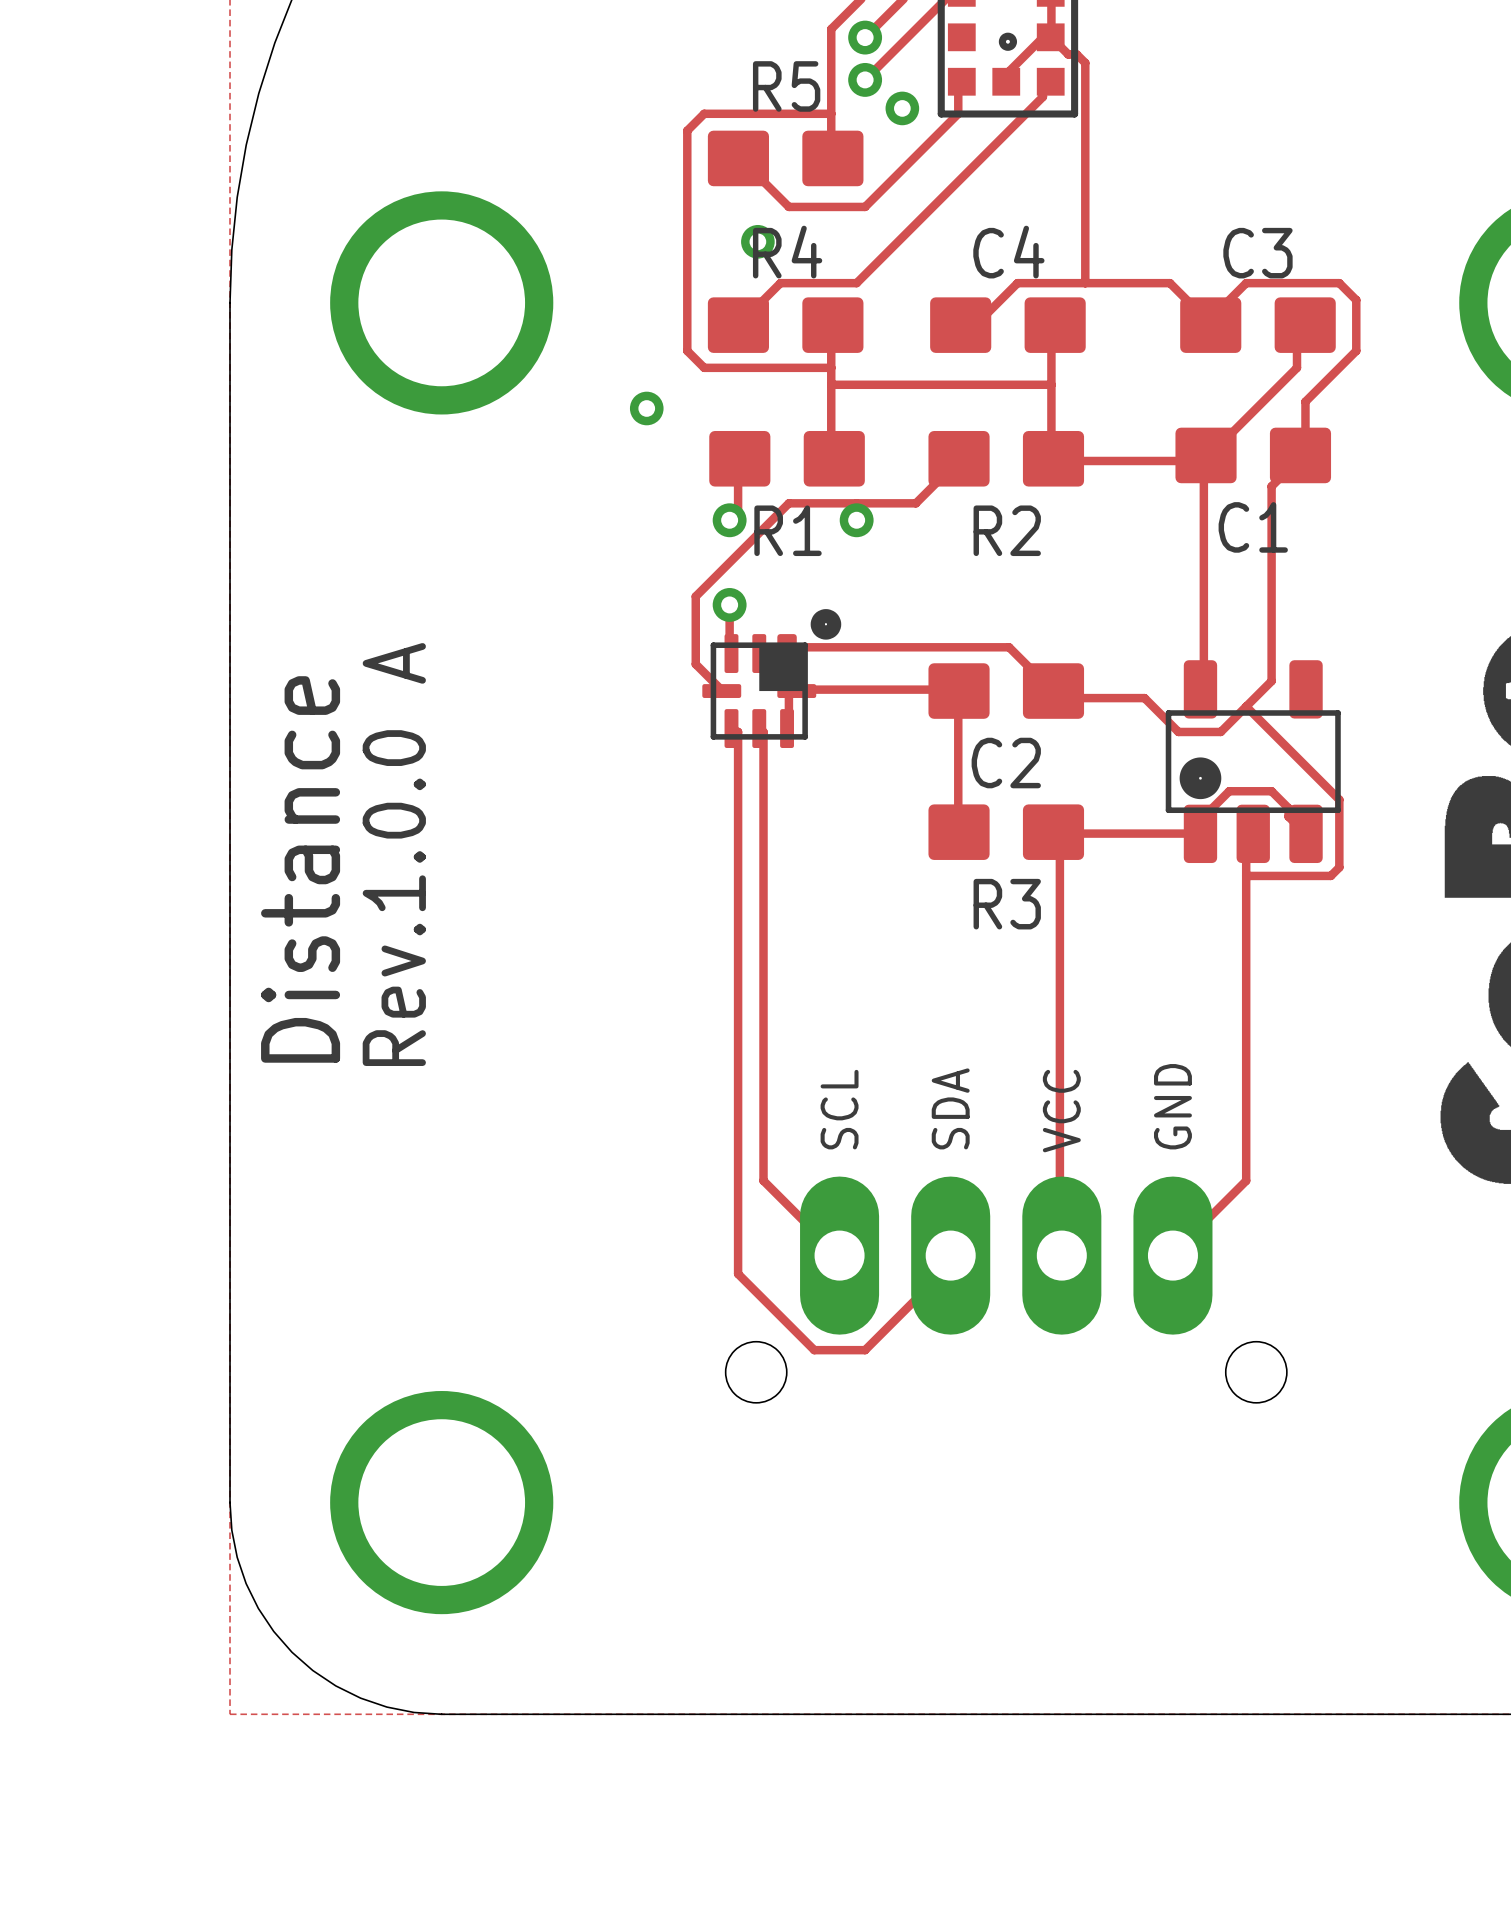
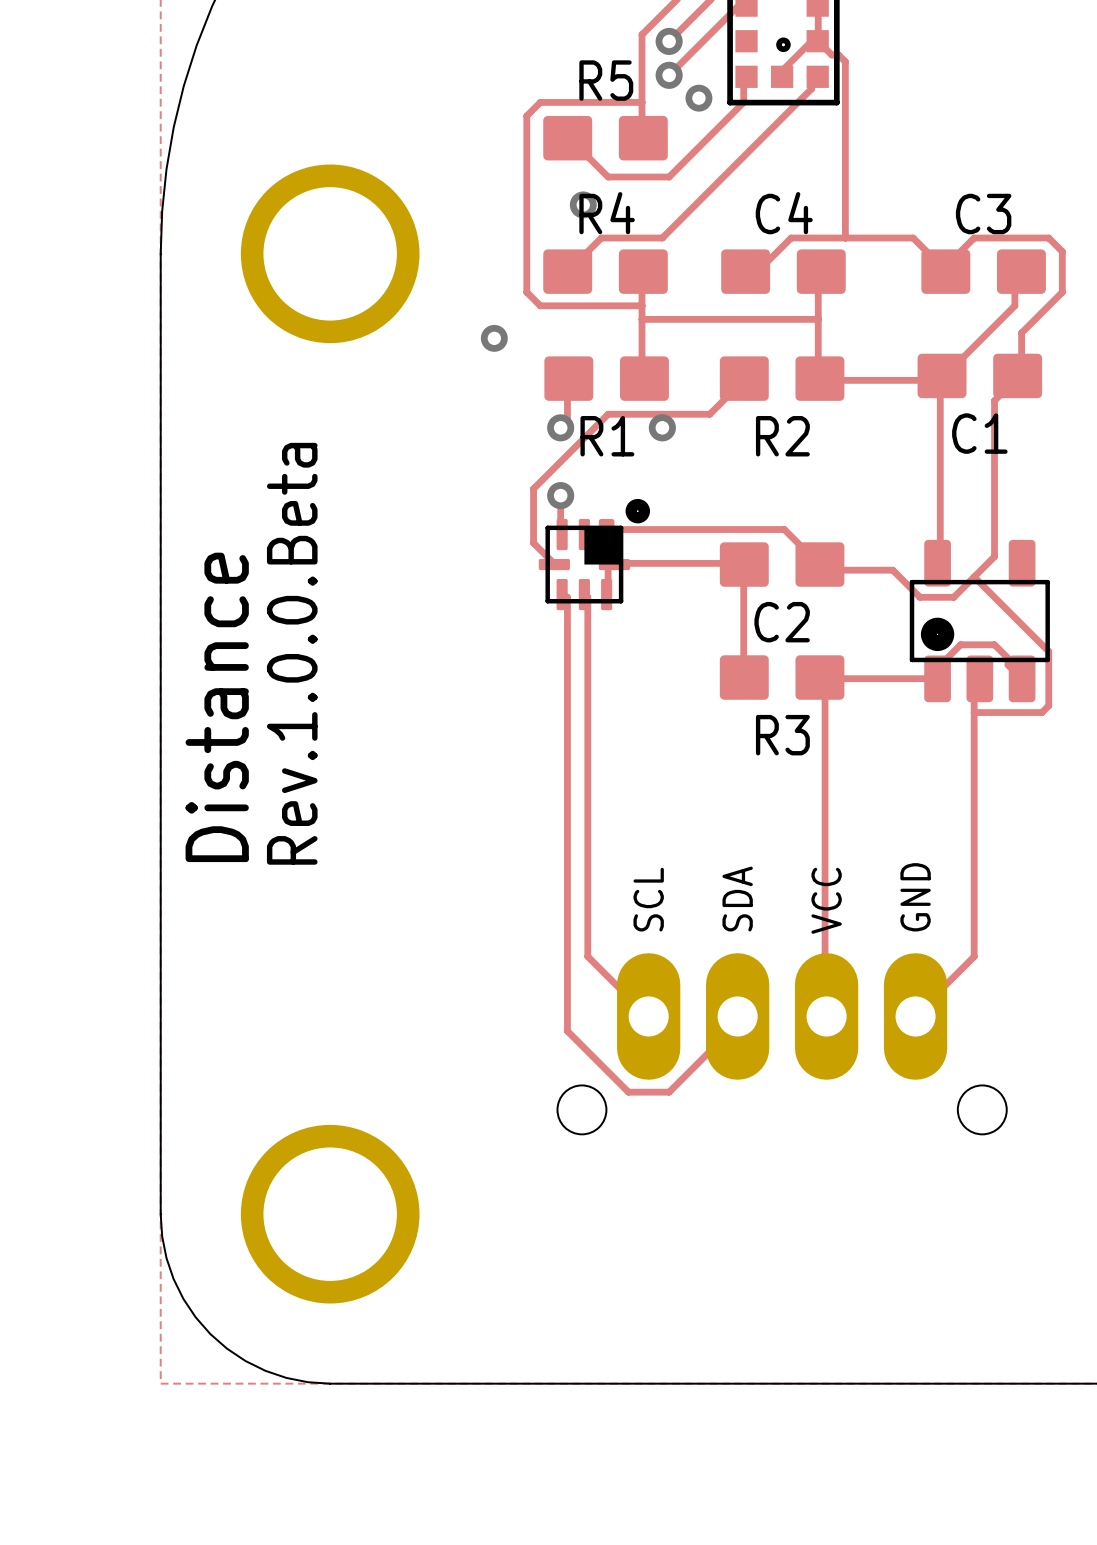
text: Rev.1.0.0 A (394, 854) -> Rev.1.0.0.Beta (292, 653)

